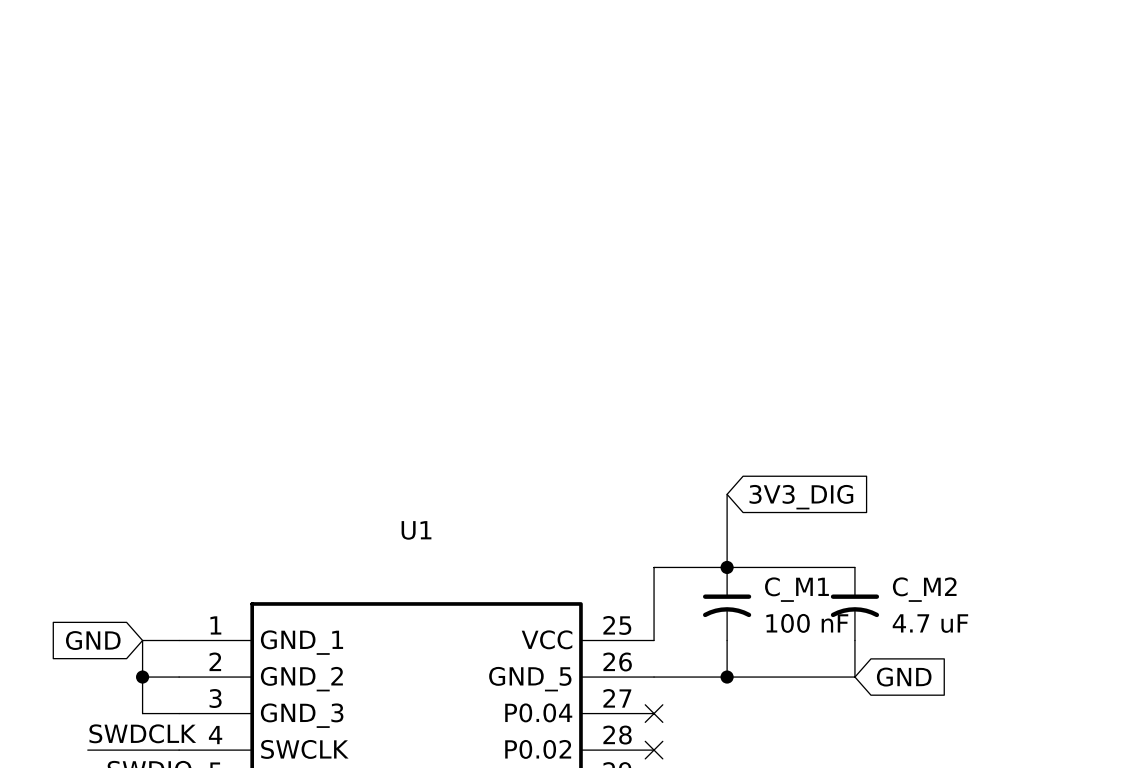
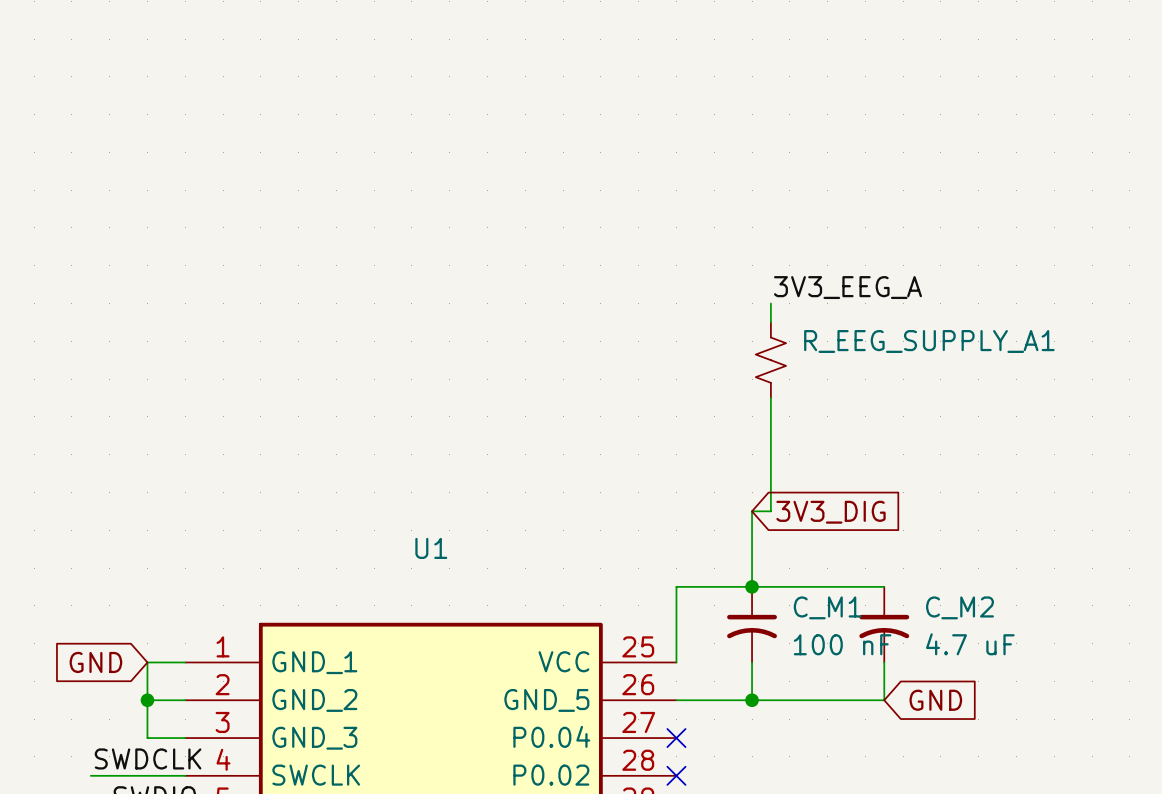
label: none -> 3V3_EEG_A (847, 287)
wire: none -> (770, 303) (770, 322)
R_EEG_SUPPLY_A1: none -> (770, 360)
wire: none -> (770, 397) (770, 511) (752, 511)

